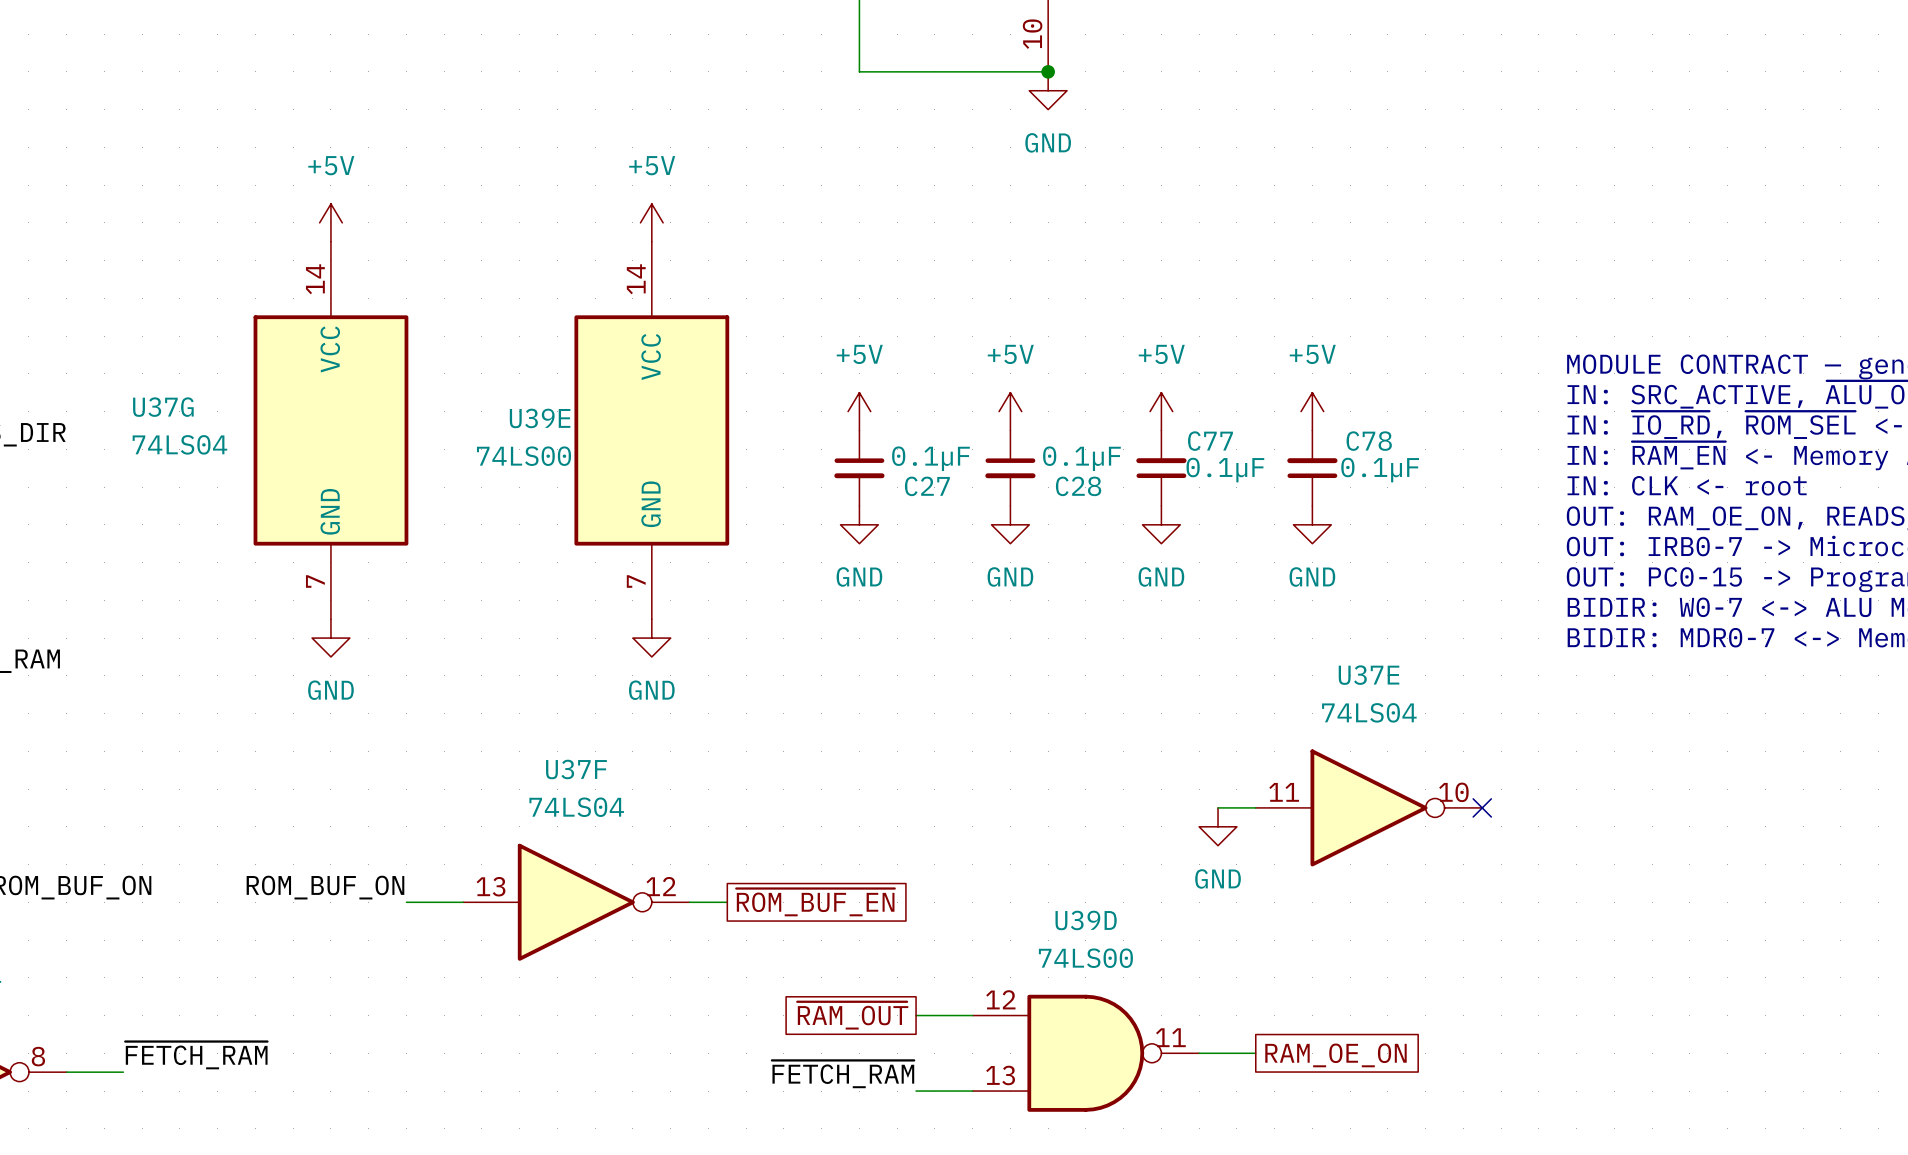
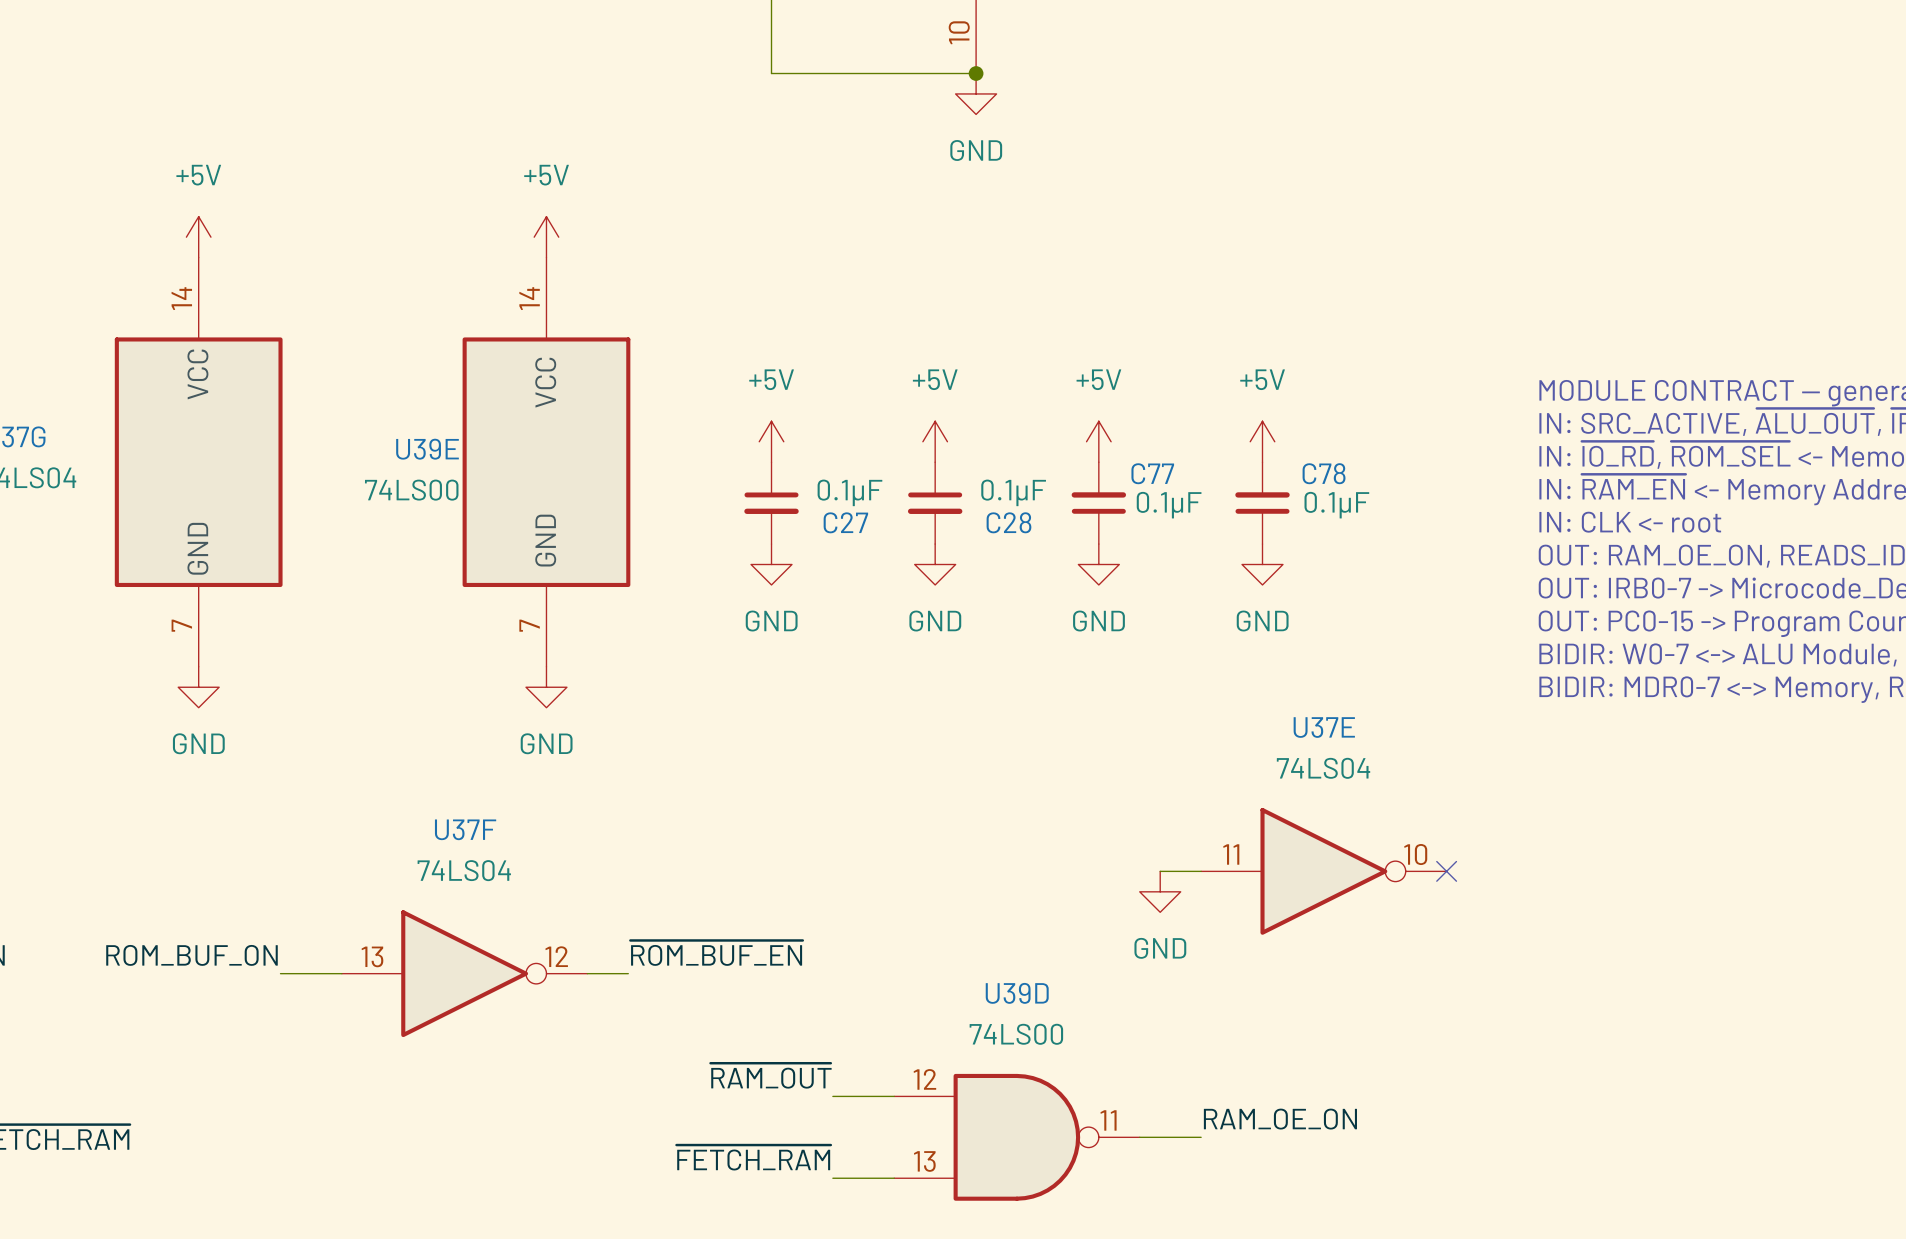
label: none -> ~{ROM_BUF_EN} (716, 953)
global label: ~{ROM_BUF_EN} (815, 902) -> none
label: none -> ~{RAM_OUT} (771, 1075)
global label: ~{RAM_OUT} (852, 1015) -> none
label: none -> RAM_OE_ON (1280, 1119)
global label: RAM_OE_ON (1335, 1055) -> none

